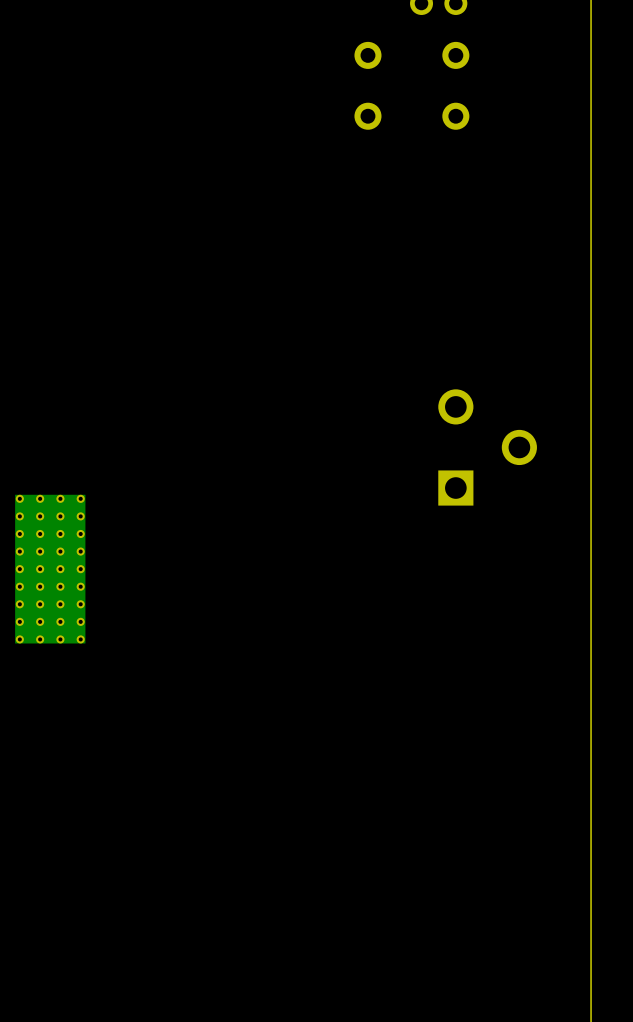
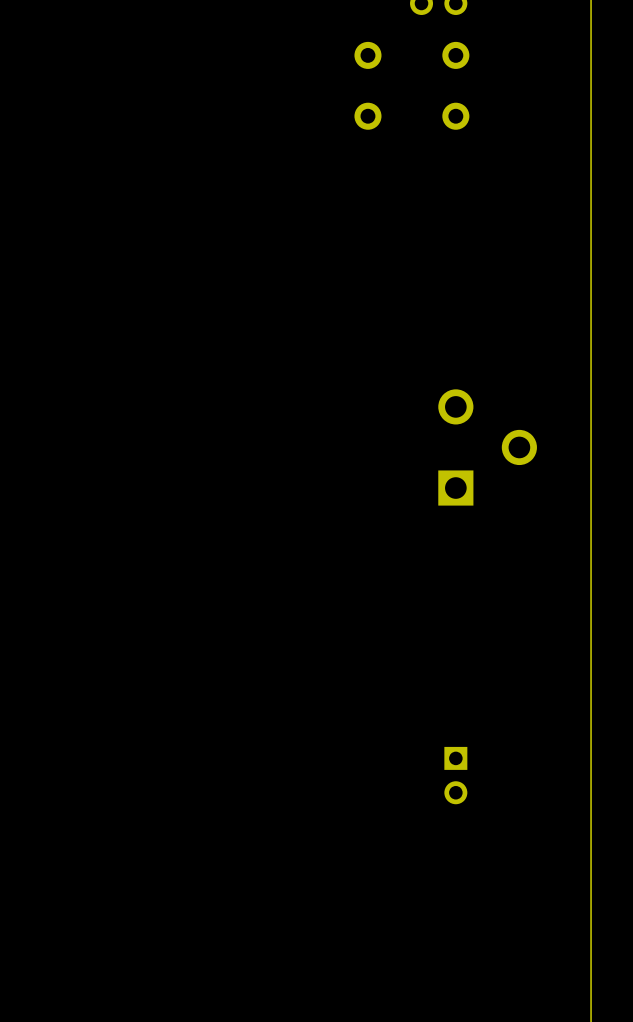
part: (50, 569) -> none
part: none -> (455, 775)

